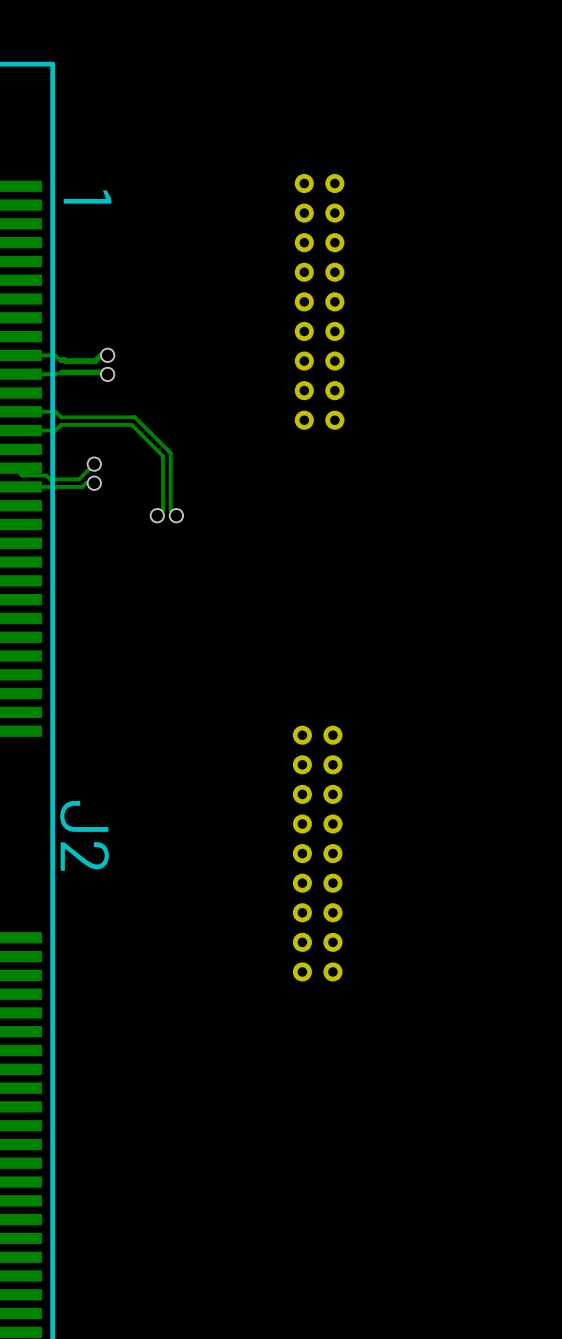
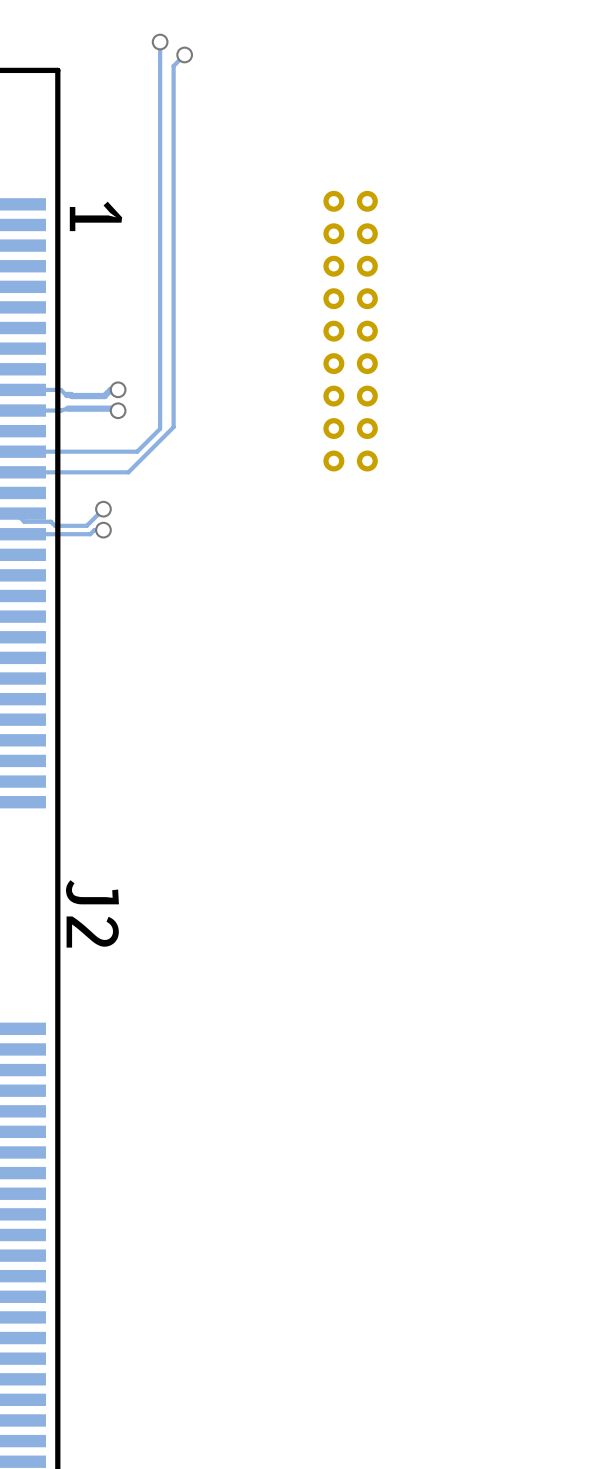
via: none -> (160, 42)
via: none -> (184, 54)
track: (55, 411) (61, 417) (134, 417) (170, 453) (170, 509) (176, 515) -> (60, 451) (137, 451) (160, 428) (160, 42)
track: (55, 430) (61, 424) (131, 424) (163, 456) (163, 509) (157, 515) -> (60, 472) (128, 472) (173, 427) (173, 65) (184, 54)
via: (157, 515) -> none
via: (176, 515) -> none
part: (317, 853) -> none

